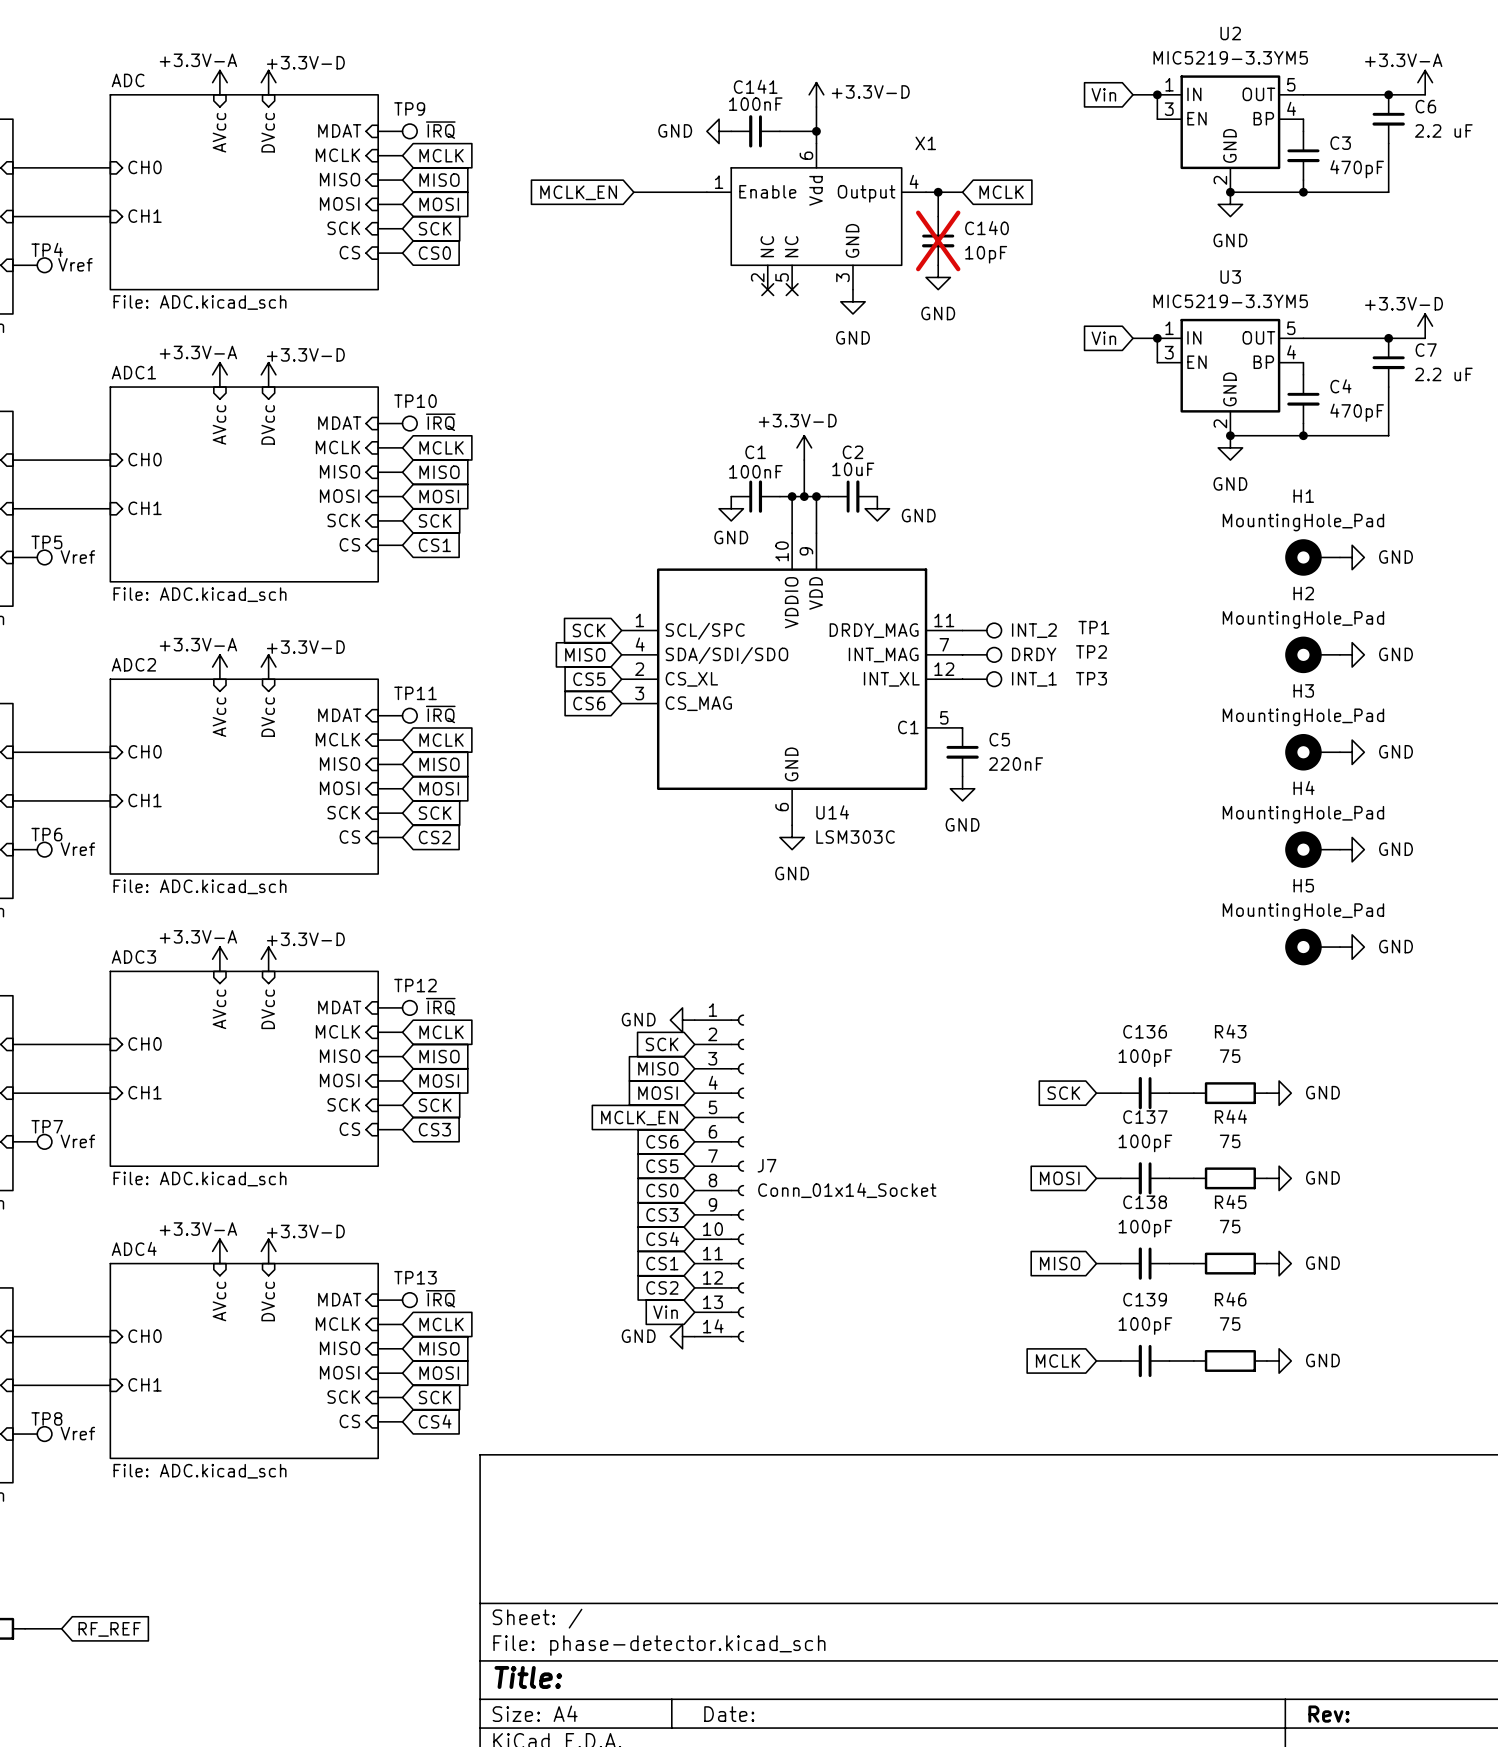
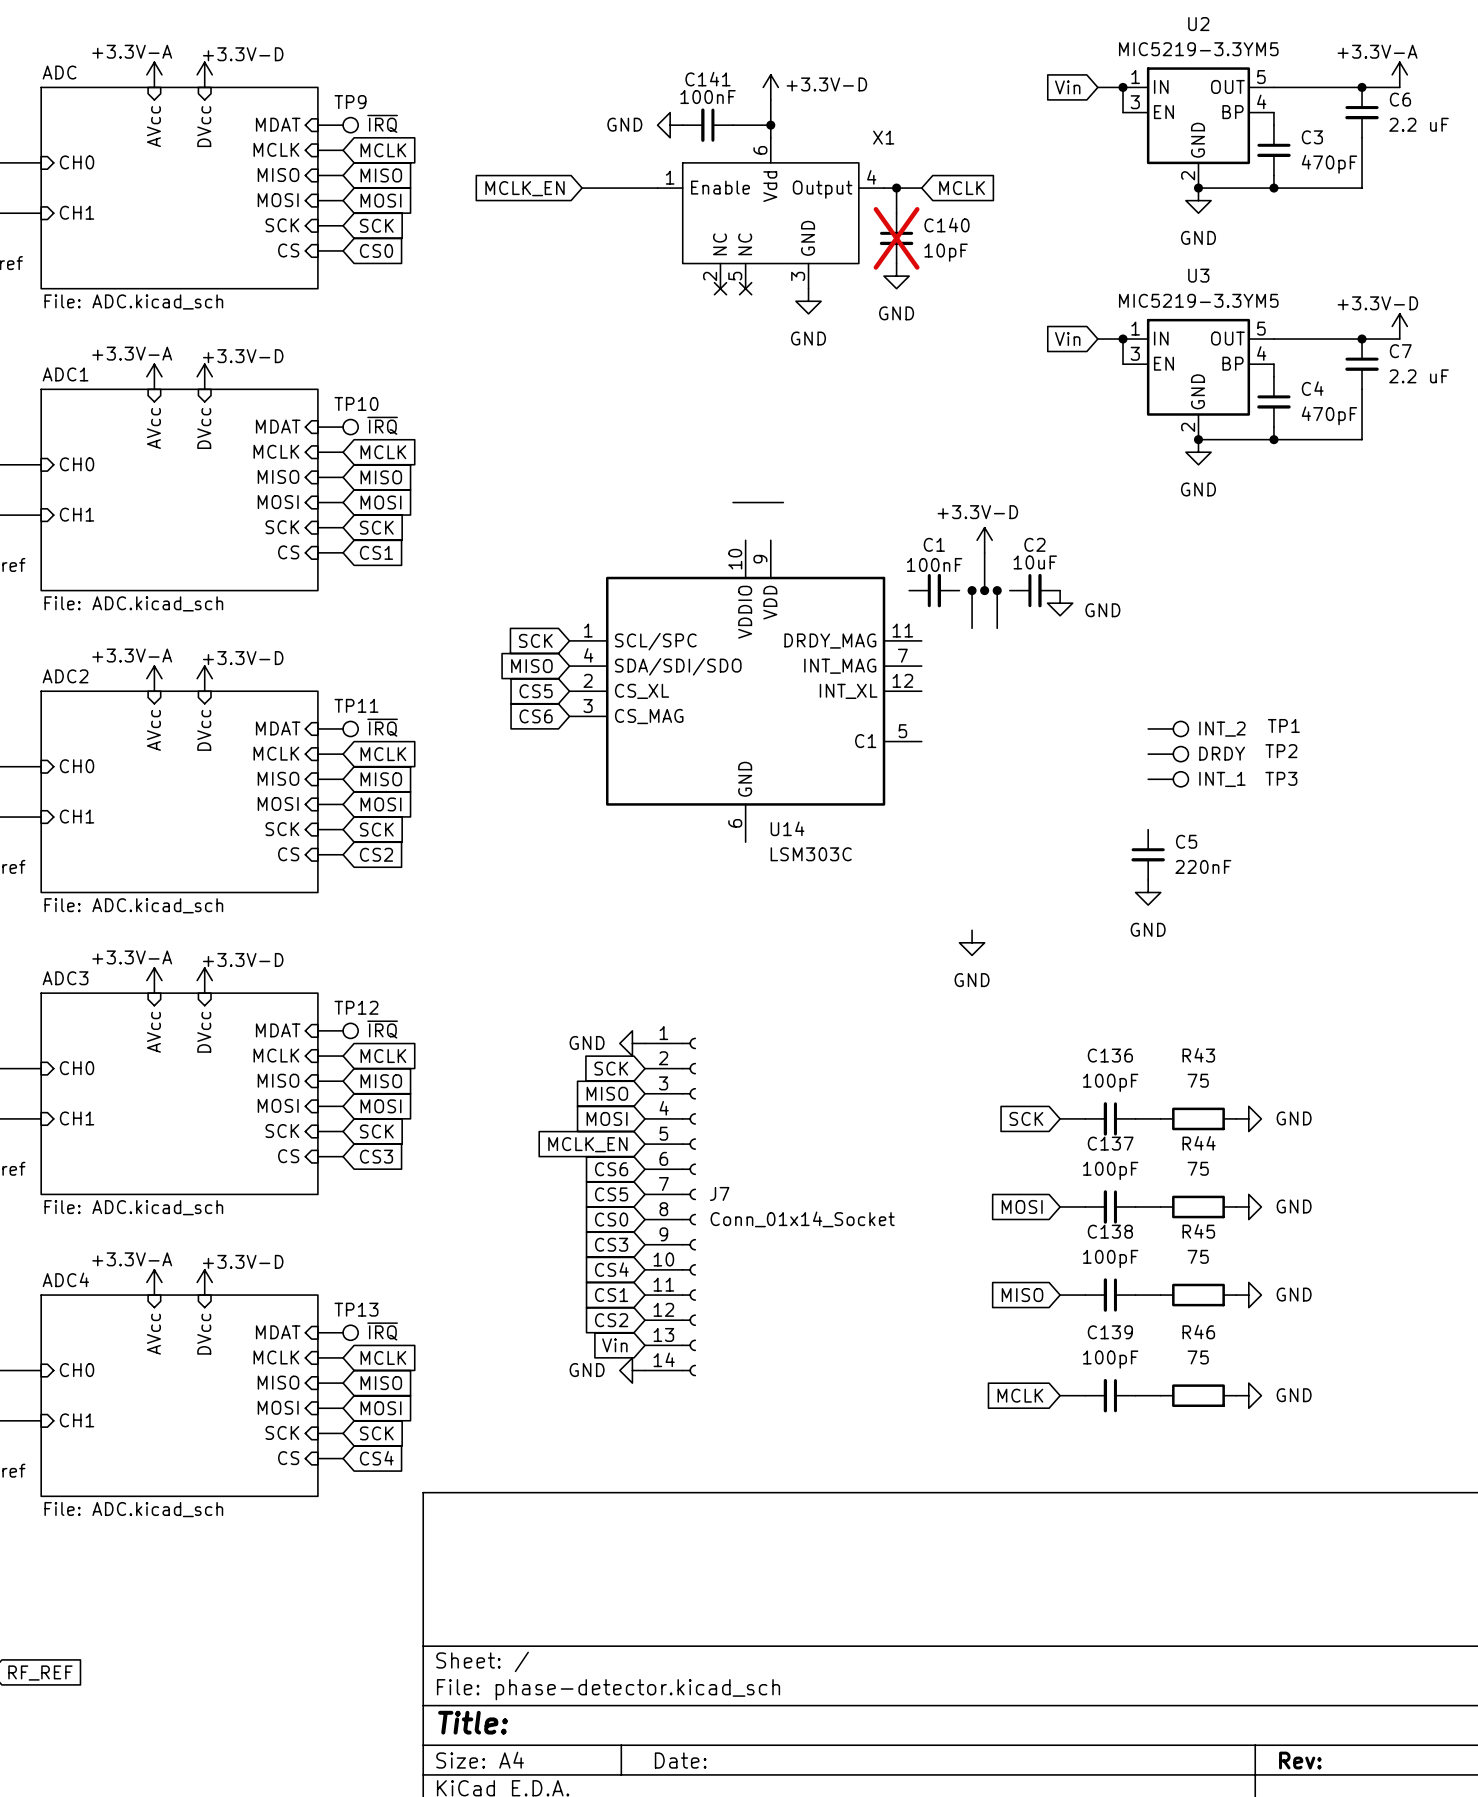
power symbol position: +3.3V-D (804, 447) -> +3.3V-D (984, 540)
wire: (804, 460) (804, 496) -> (984, 552) (984, 590)
C1 position: (755, 496) -> (934, 590)
wire: (792, 496) (792, 533) -> (972, 590) (972, 628)
junction: (792, 496) -> none
junction: (804, 496) -> none
wire: (816, 496) (816, 533) -> (997, 590) (997, 628)
junction: (816, 496) -> none
C2 position: (852, 496) -> (1034, 590)
power symbol: GND (731, 508) -> none
power symbol: GND (877, 508) -> none
H1: MountingHole_Pad (1312, 557) -> none
power symbol: GND (1352, 557) -> none
junction: none -> (972, 590)
junction: none -> (984, 590)
junction: none -> (997, 590)
power symbol: none -> GND (1060, 603)
TP1 position: (982, 630) -> (1168, 728)
TP2 position: (982, 654) -> (1168, 754)
H2: MountingHole_Pad (1312, 654) -> none
power symbol: GND (1352, 654) -> none
TP3 position: (982, 679) -> (1168, 779)
C5 position: (962, 752) -> (1148, 854)
H3: MountingHole_Pad (1312, 752) -> none
power symbol: GND (1352, 752) -> none
power symbol: GND (962, 788) -> none
power symbol: GND (792, 837) -> none
H4: MountingHole_Pad (1312, 849) -> none
power symbol: GND (1352, 849) -> none
power symbol: none -> GND (1148, 892)
power symbol: none -> GND (972, 942)
H5: MountingHole_Pad (1312, 947) -> none
power symbol: GND (1352, 947) -> none

